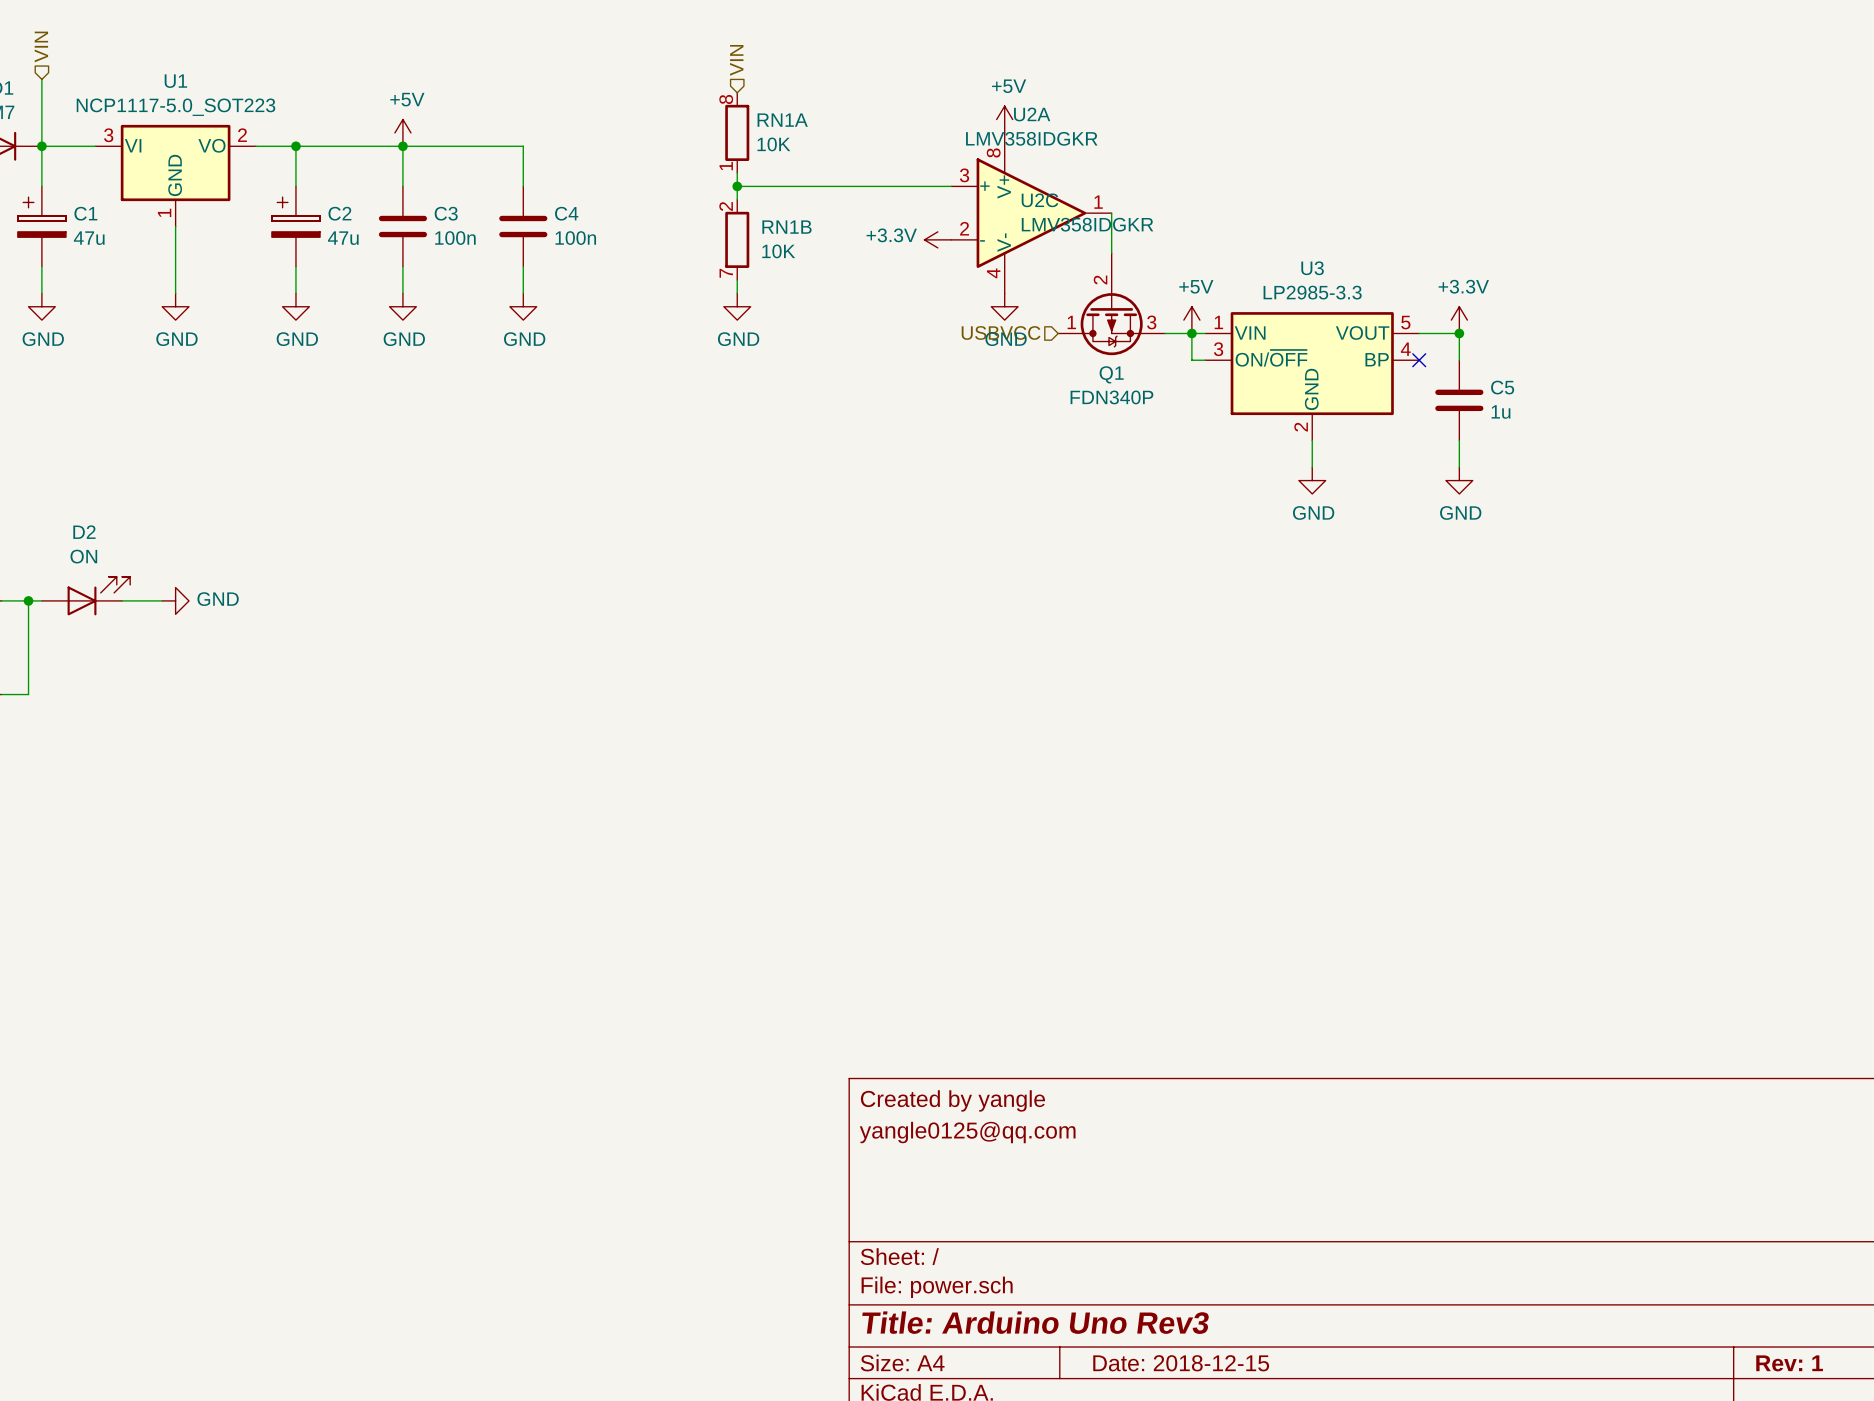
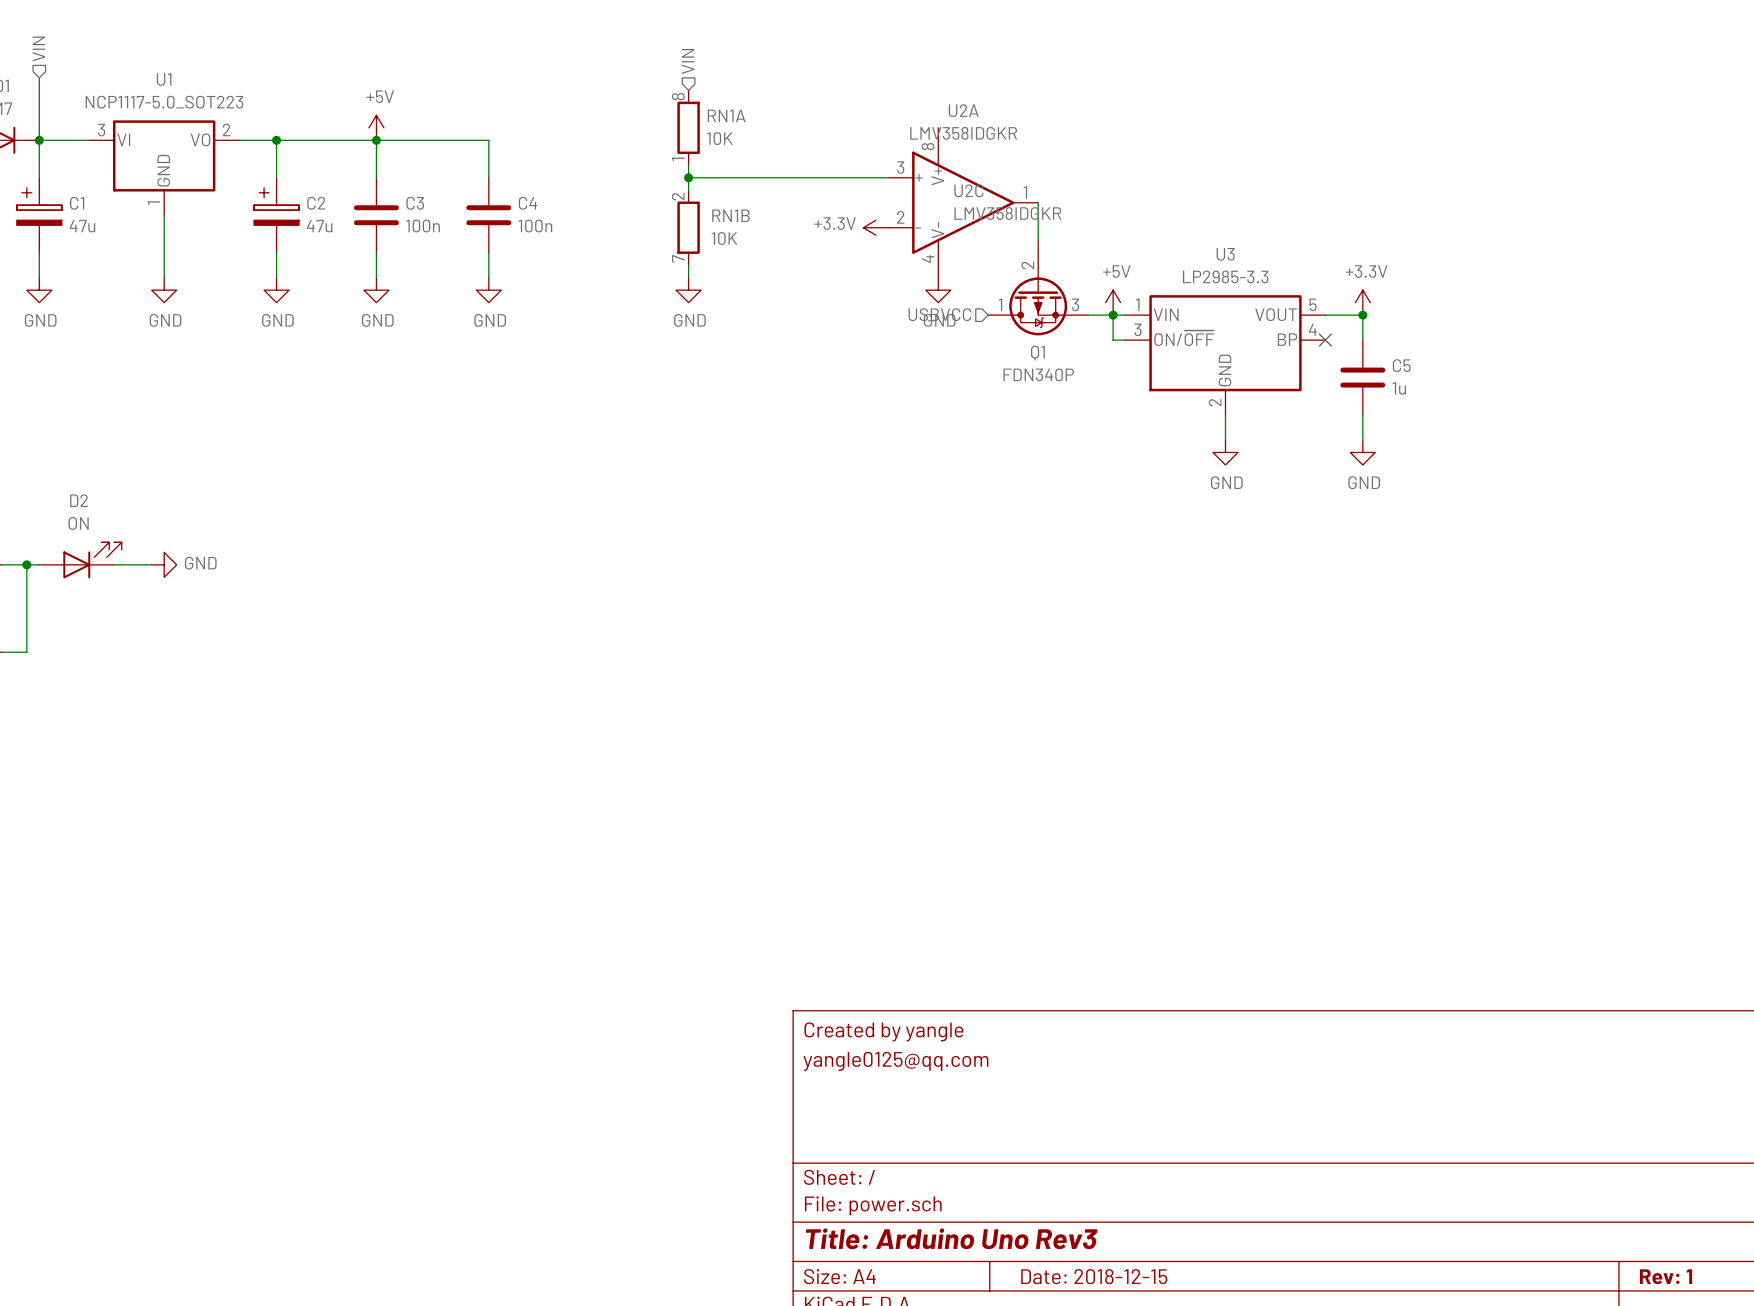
power symbol: +5V (1004, 119) -> none

